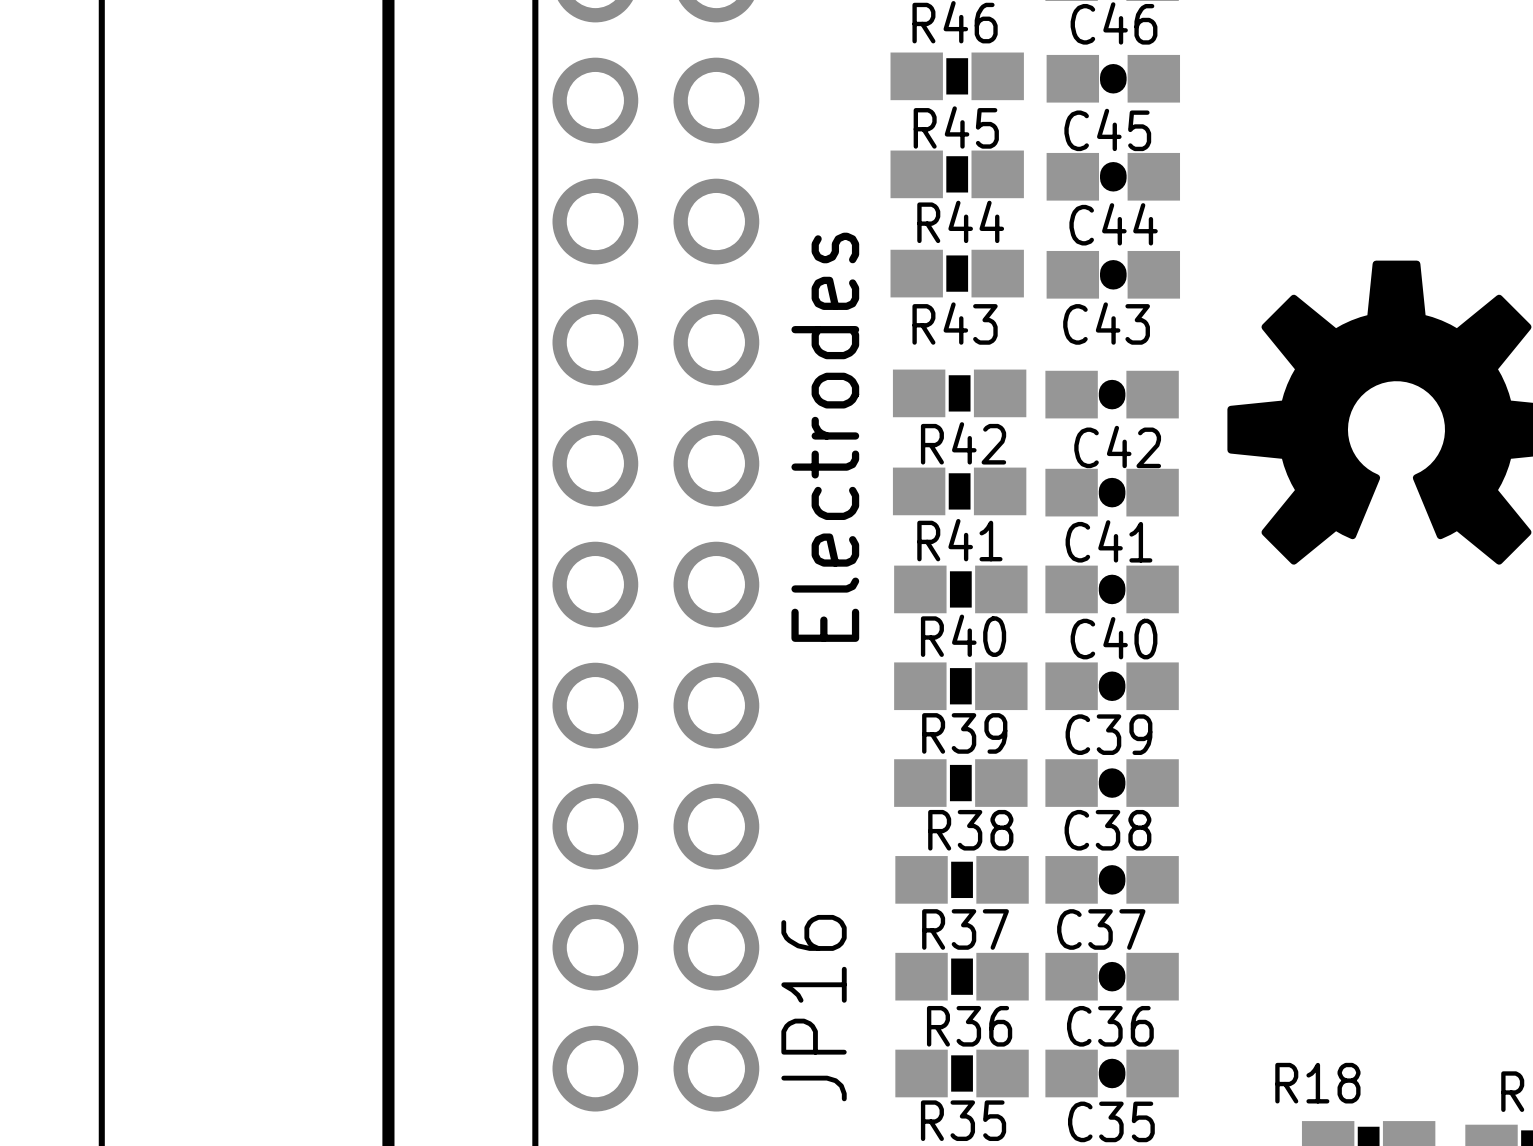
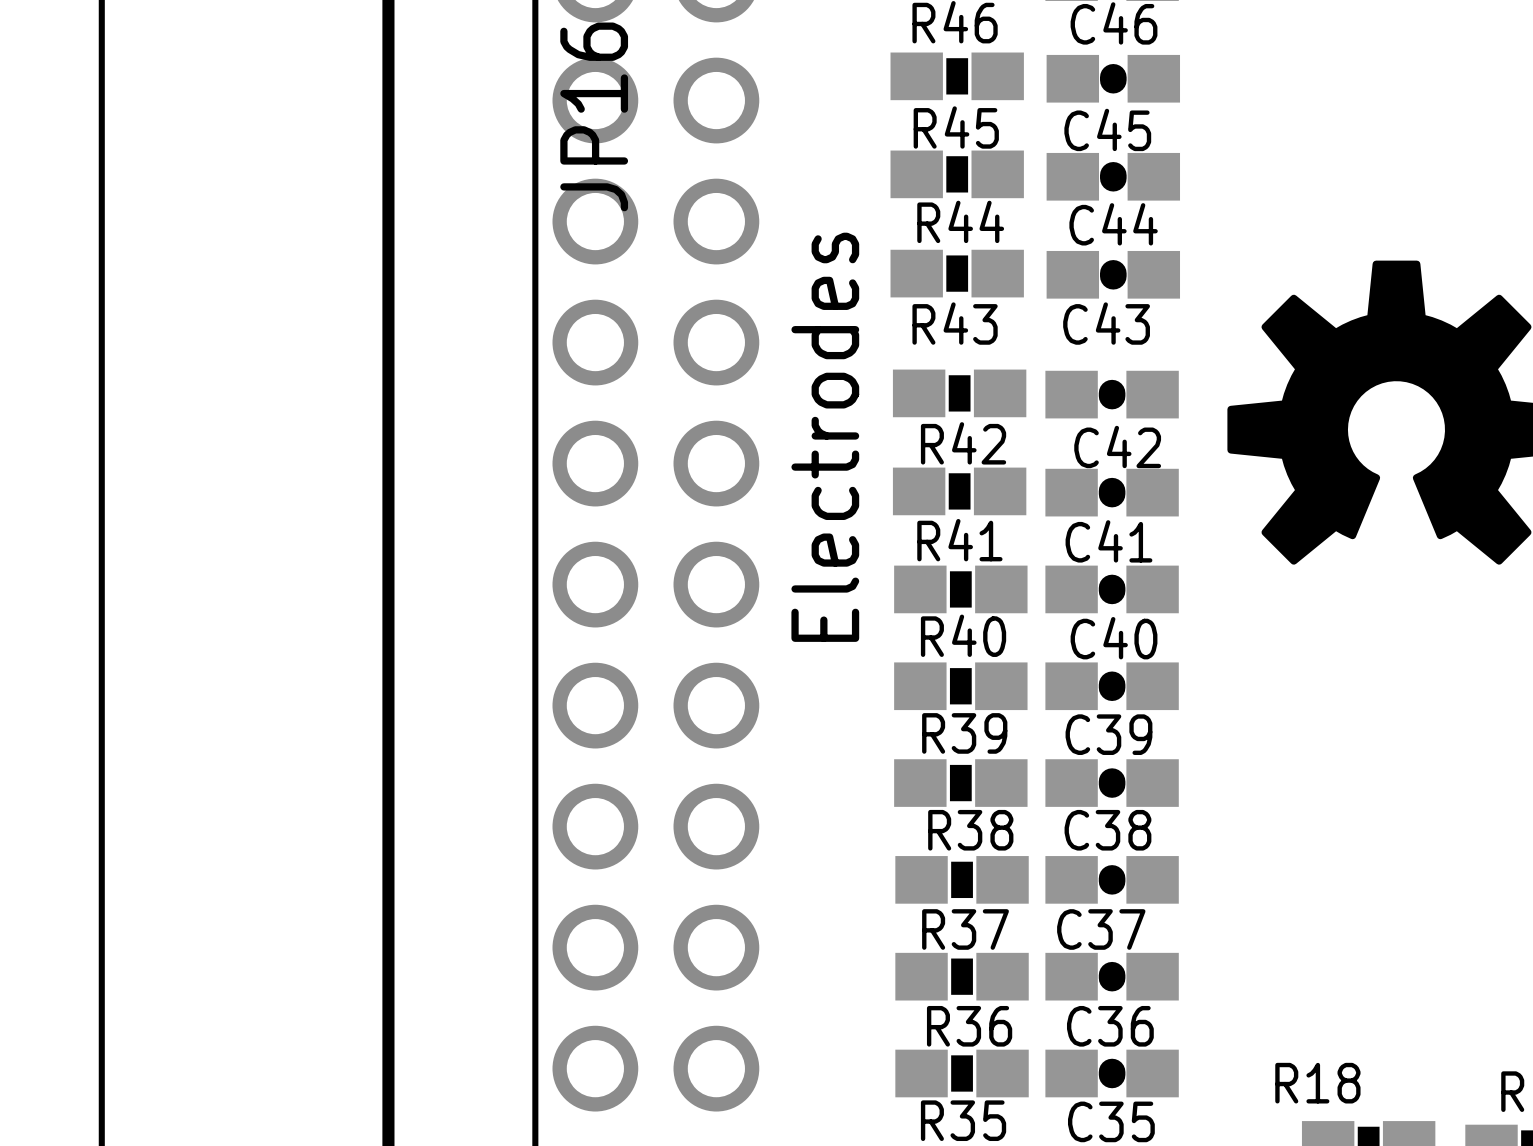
JP16 name position: JP16 (814, 1008) -> JP16 (594, 116)

